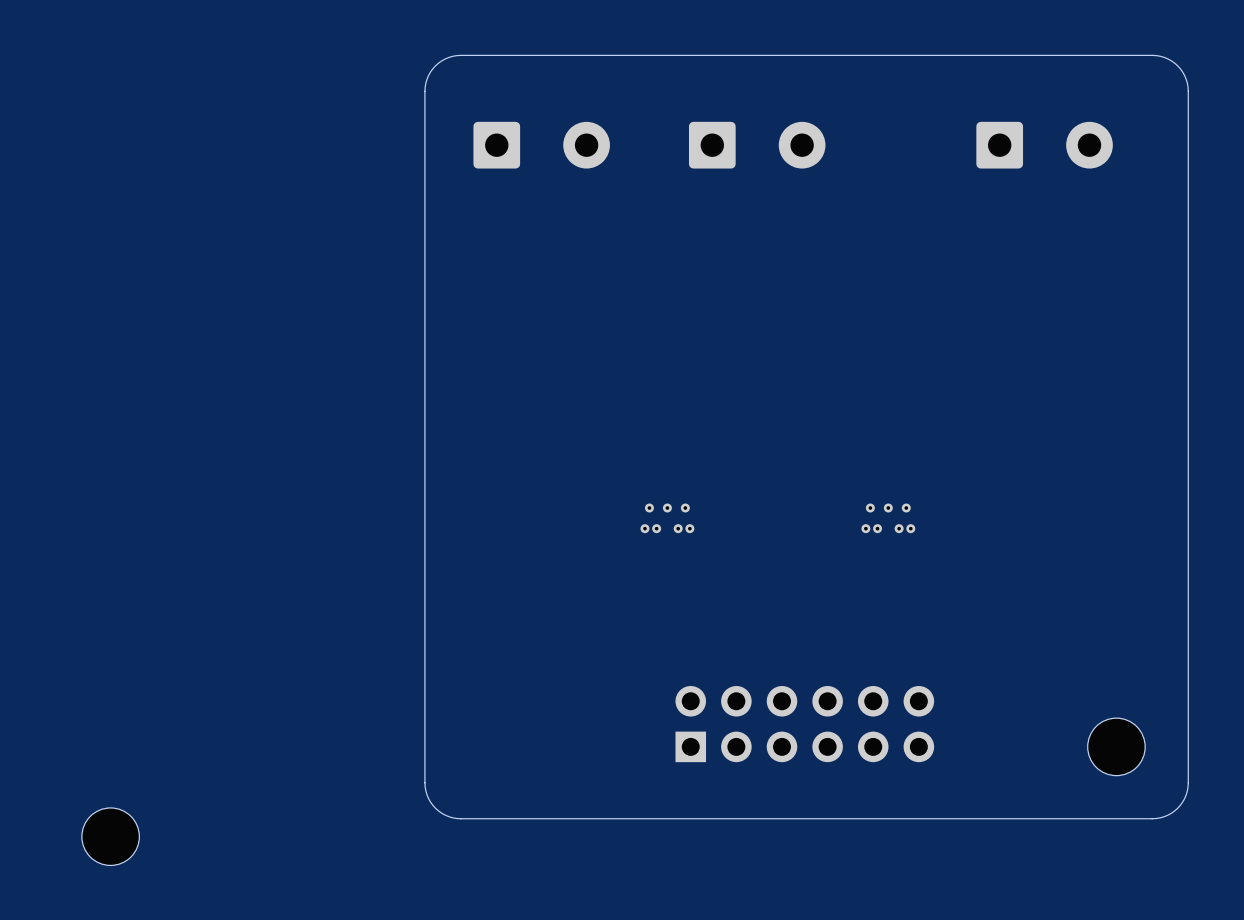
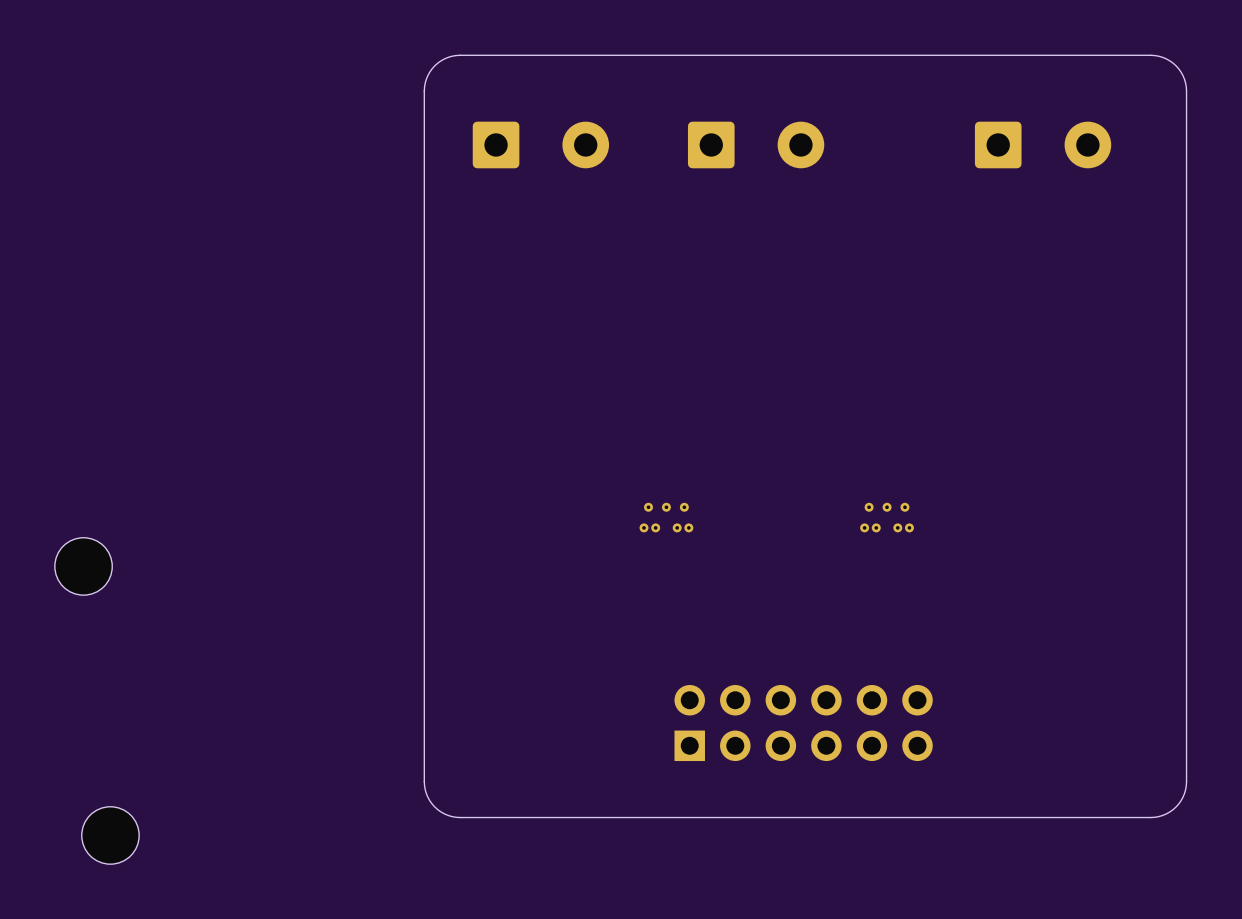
part: none -> (83, 566)
part: (1116, 746) -> none

